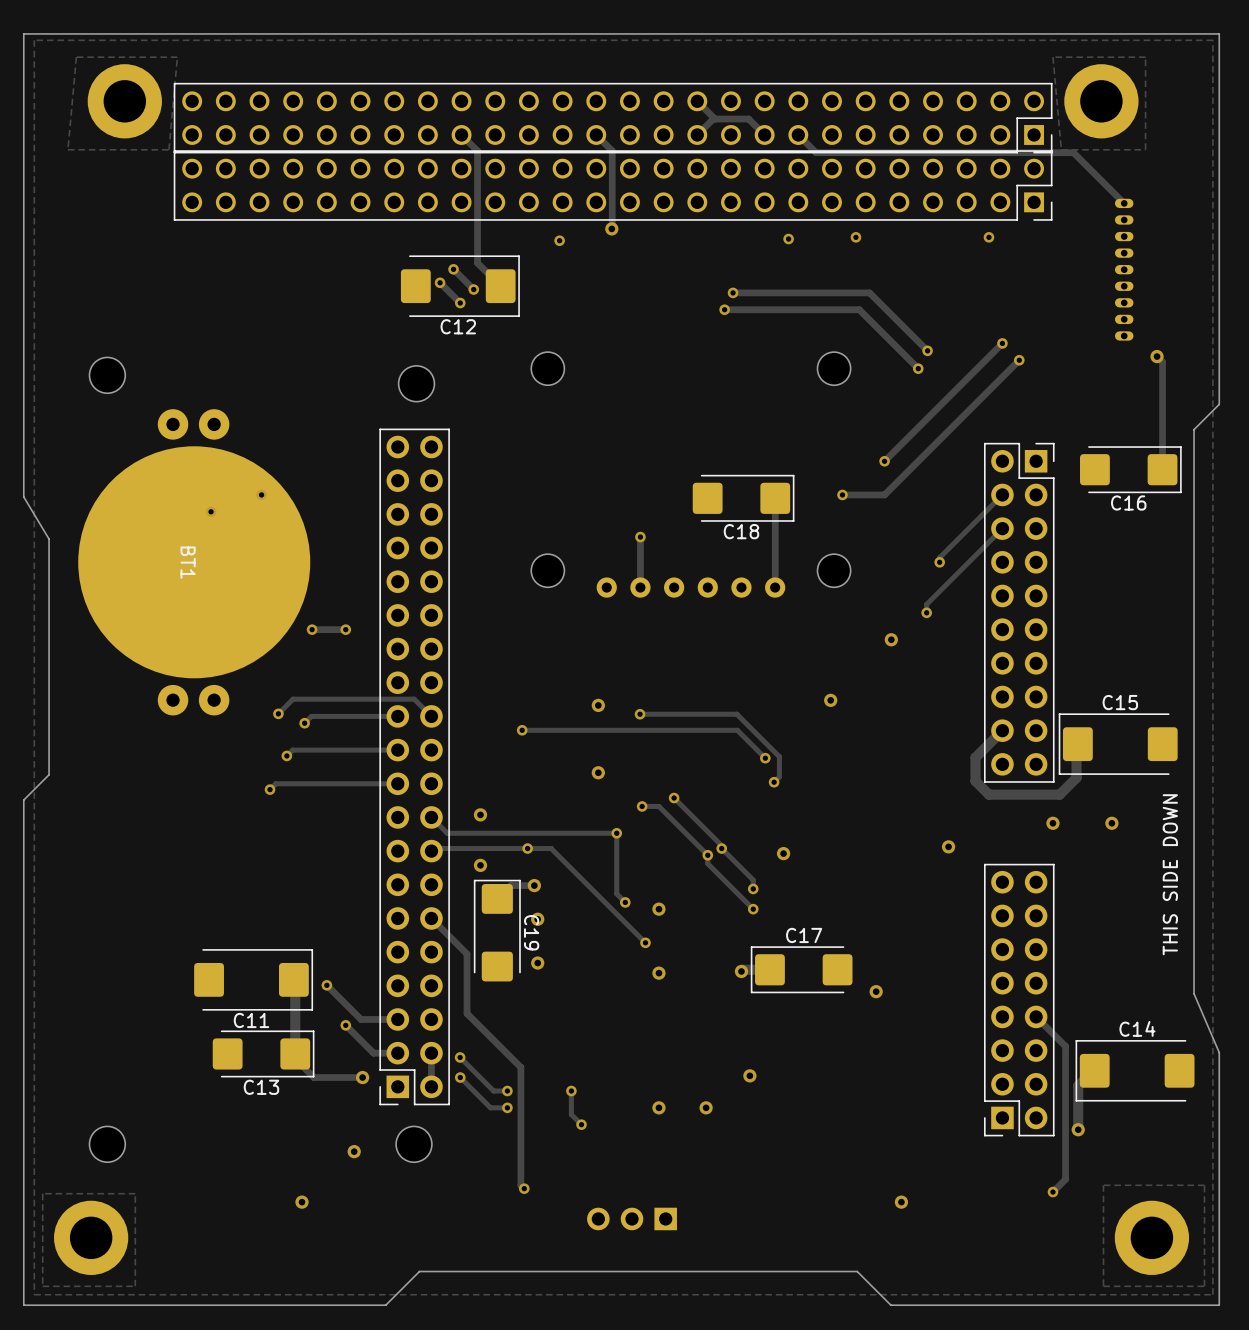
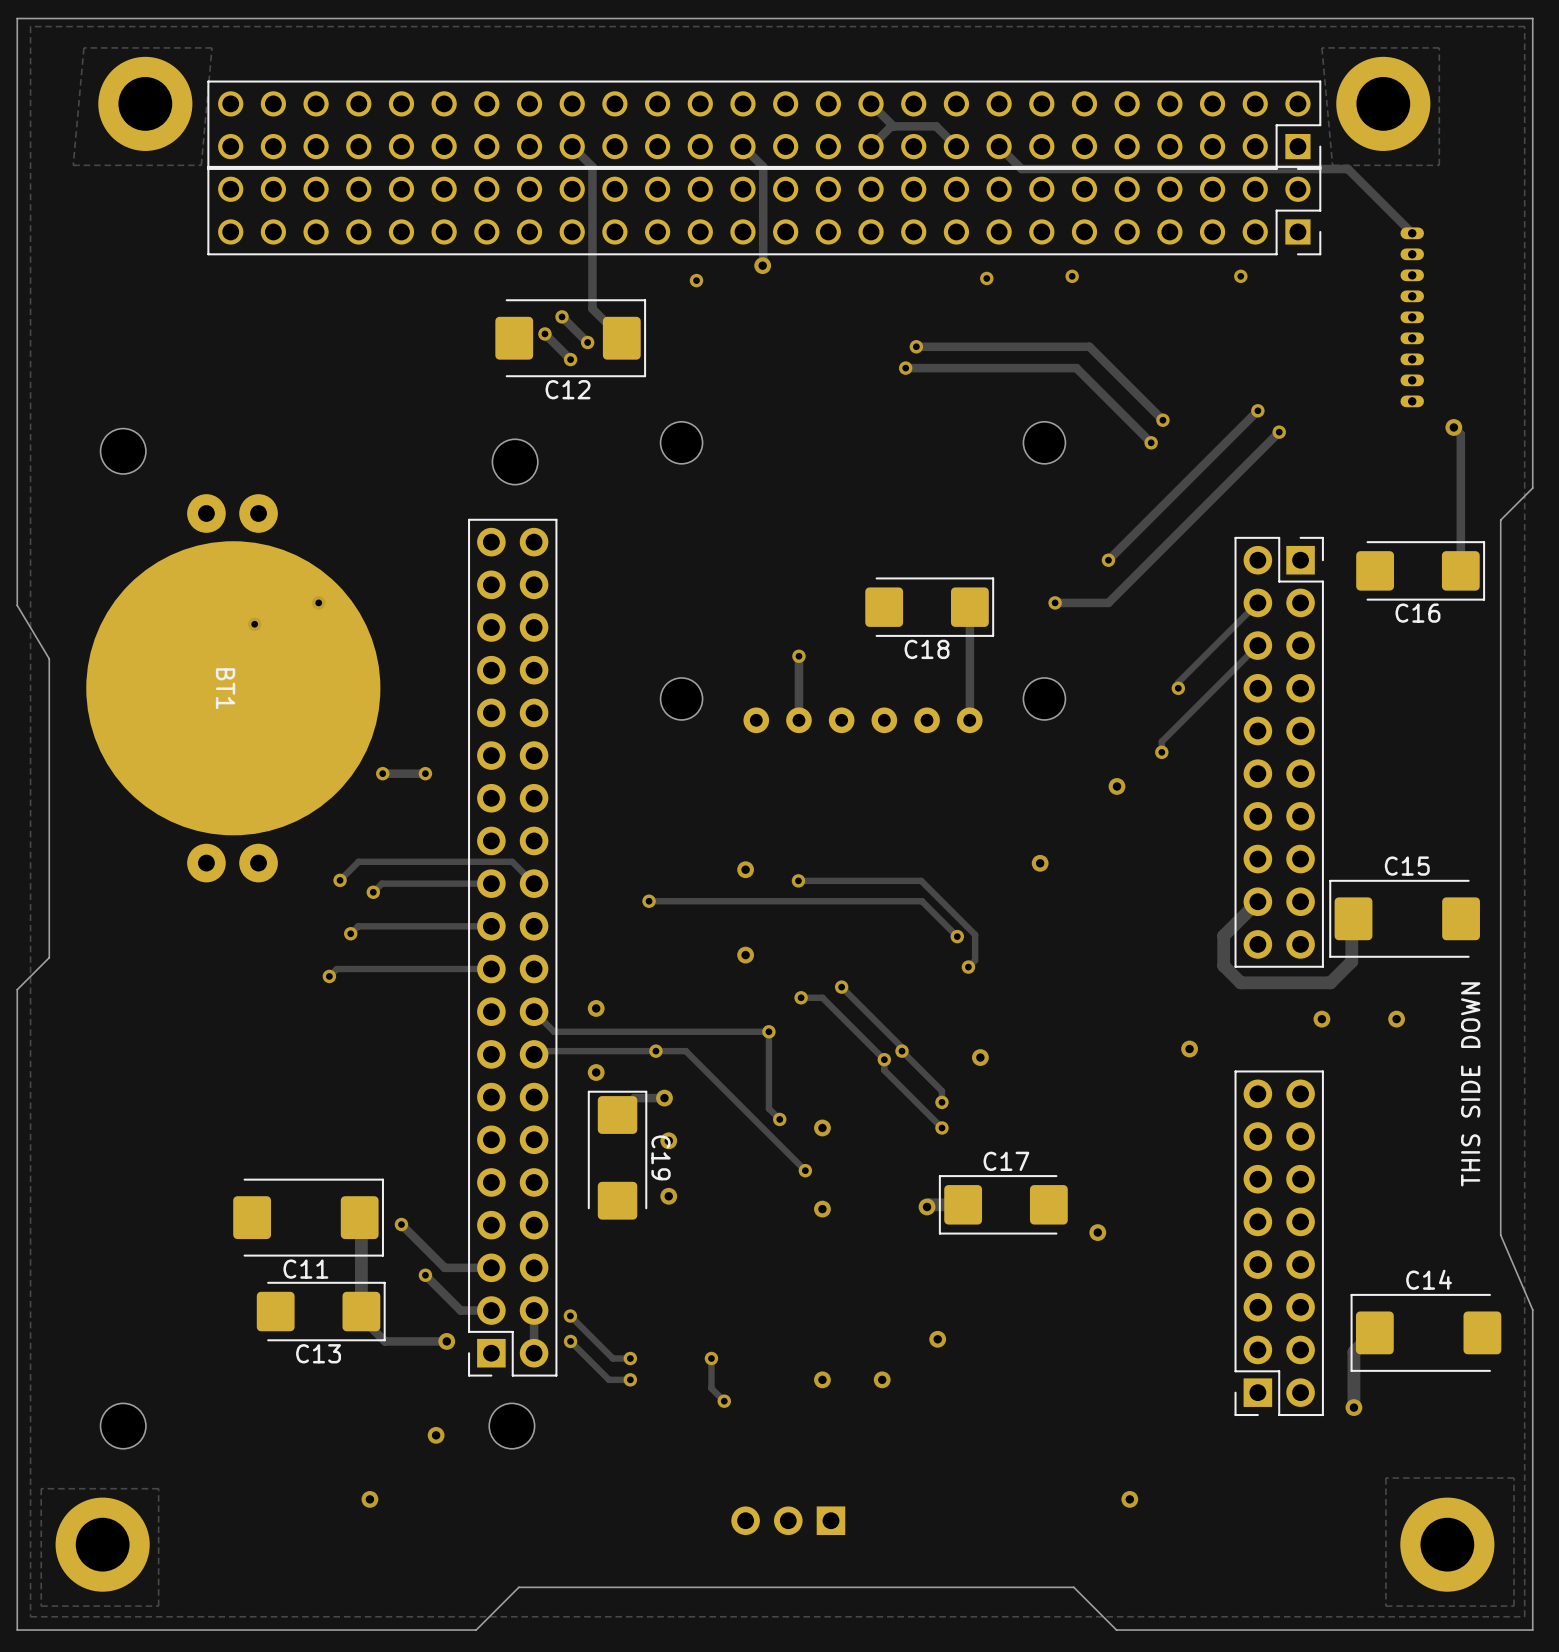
track: (431, 918) (467, 954) (467, 1013) (520, 1067) (520, 1185) (524, 1188) -> none
track: (1036, 1016) (1065, 1046) (1065, 1179) (1052, 1192) -> none
via: (524, 1188) -> none
via: (1052, 1192) -> none

